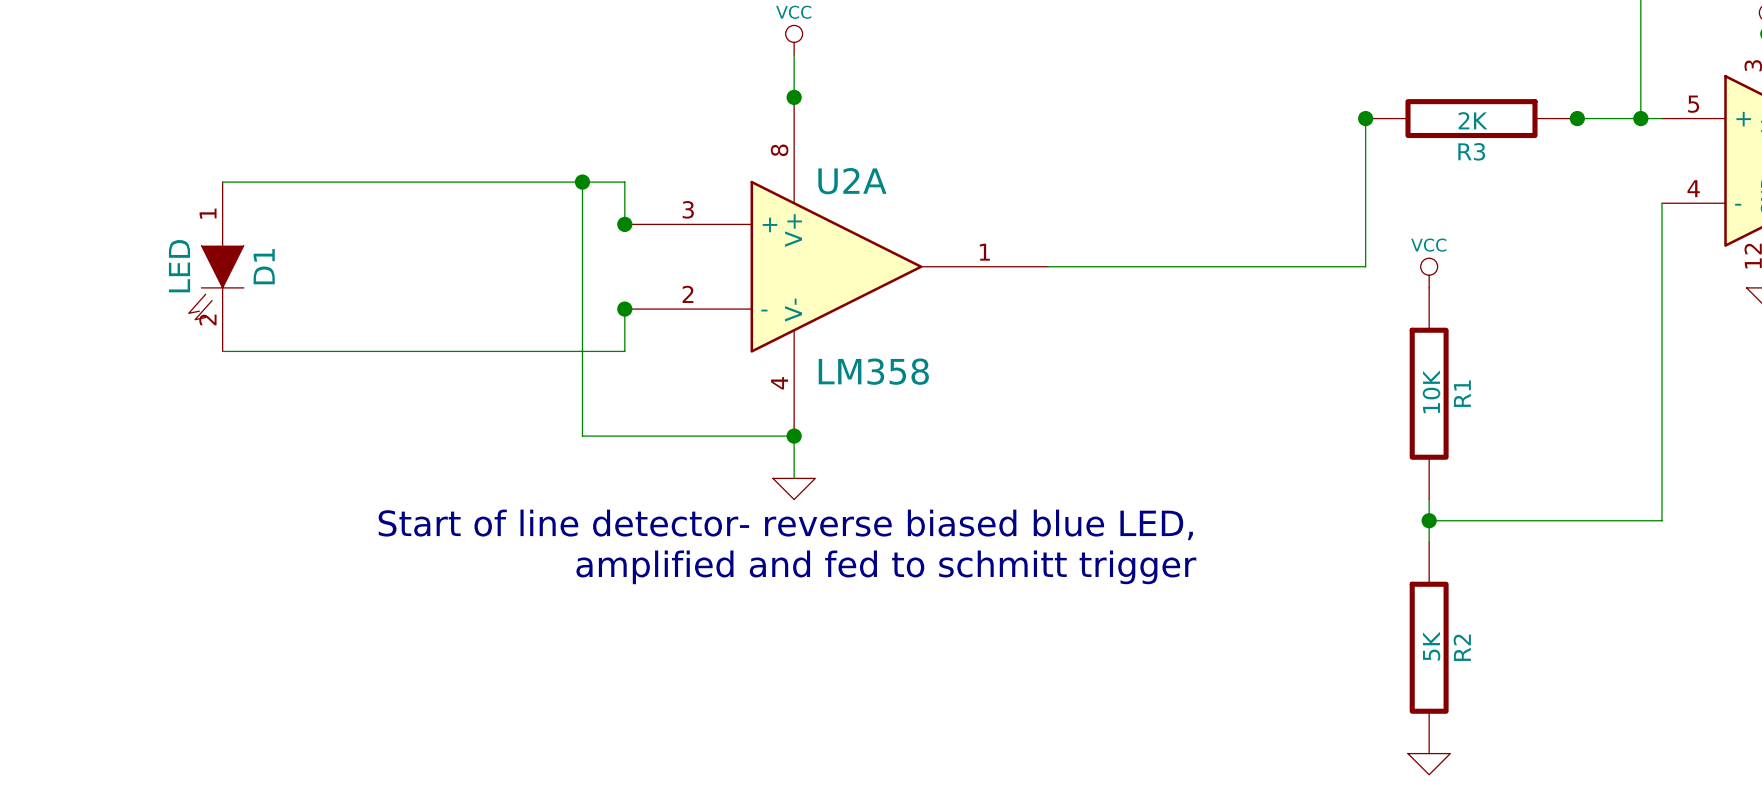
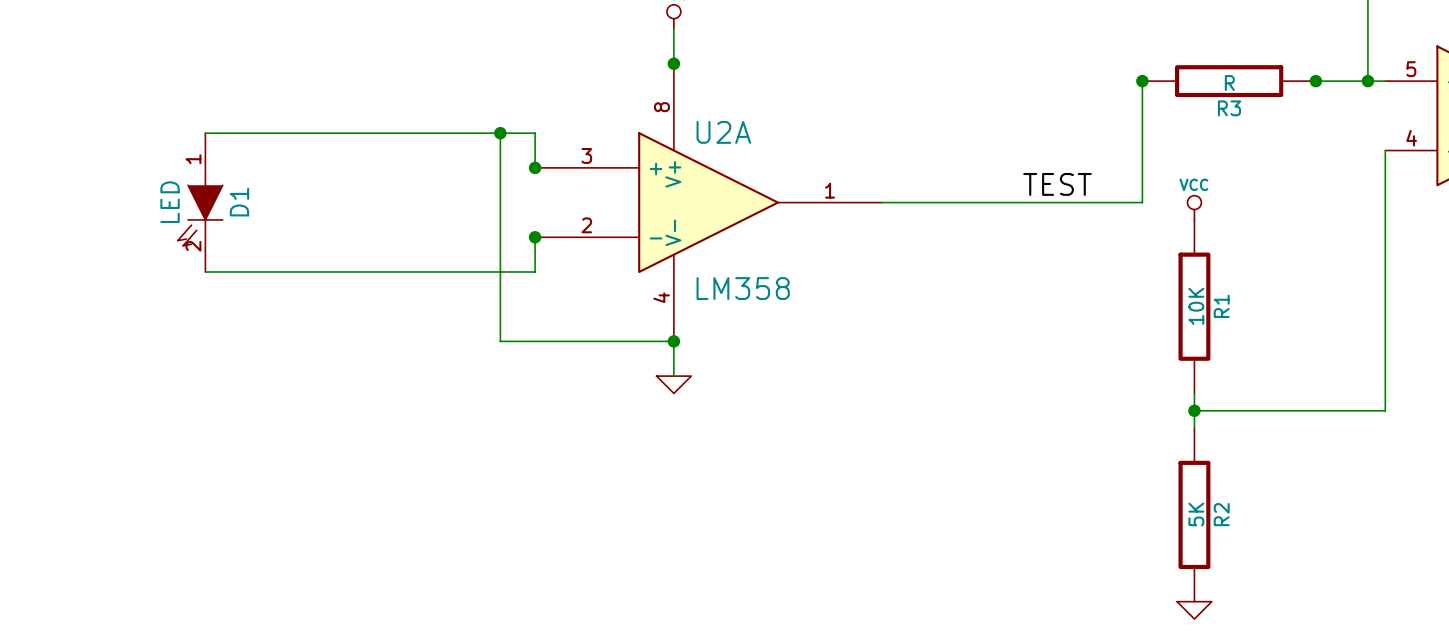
R3 value: 2K (1473, 120) -> R (1229, 83)
label: none -> TEST (1057, 184)
text: Start of line detector- reverse biased blue LED, (785, 524) -> none
text: amplified and fed to schmitt trigger (886, 567) -> none

